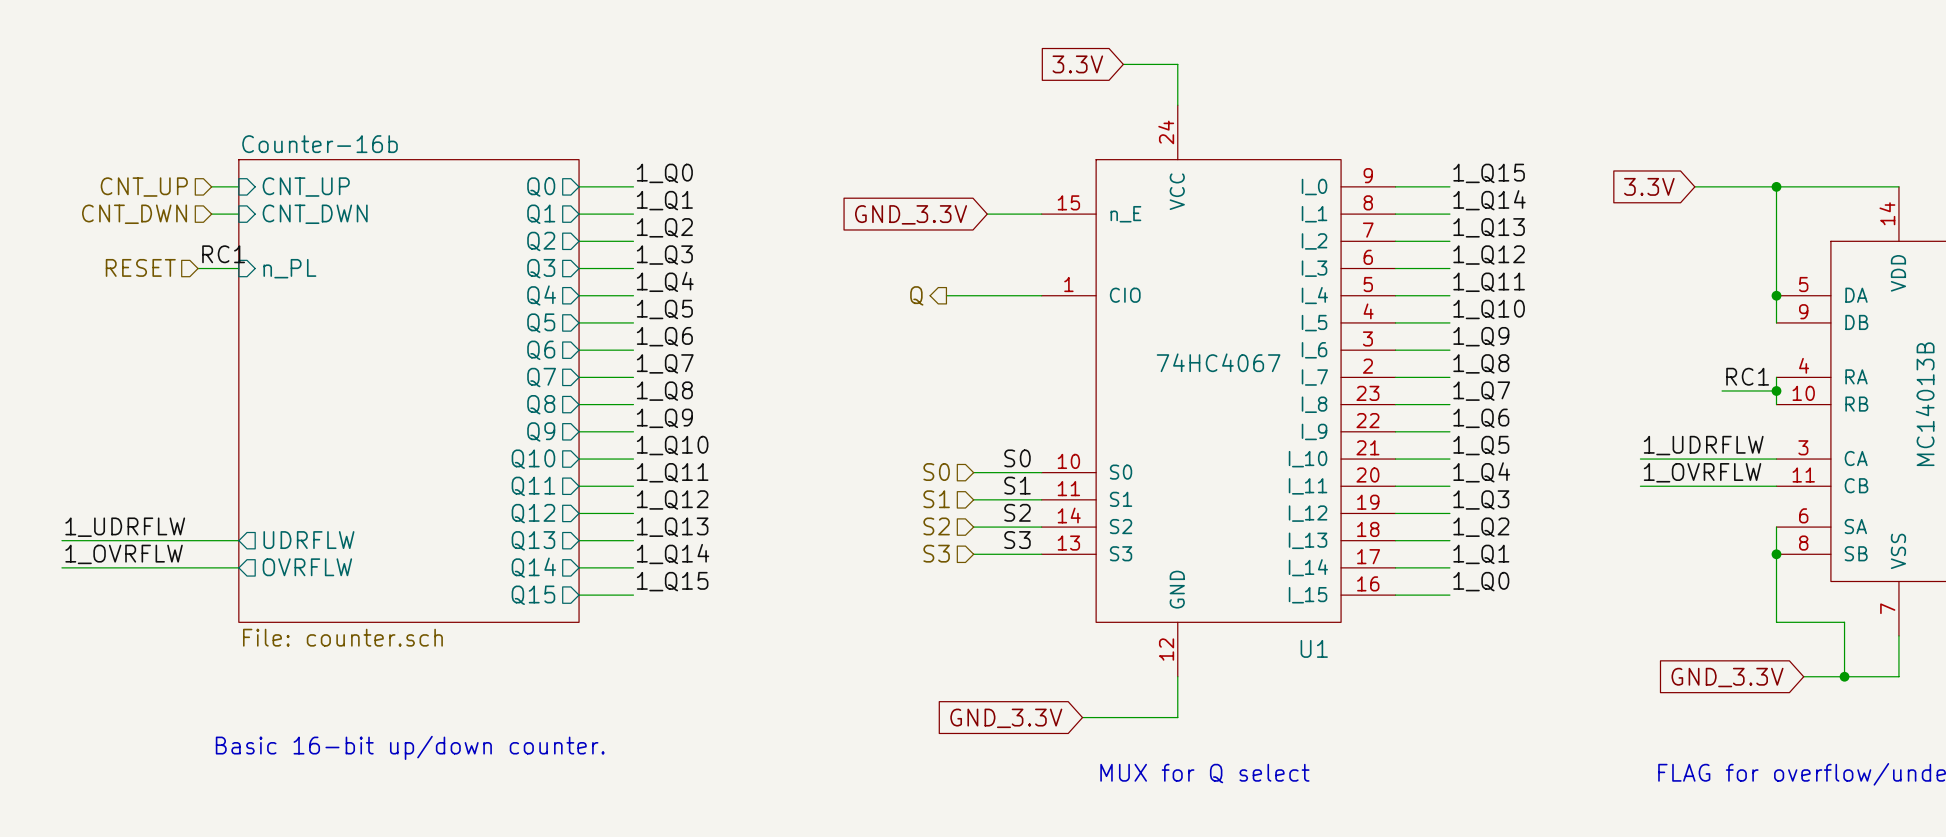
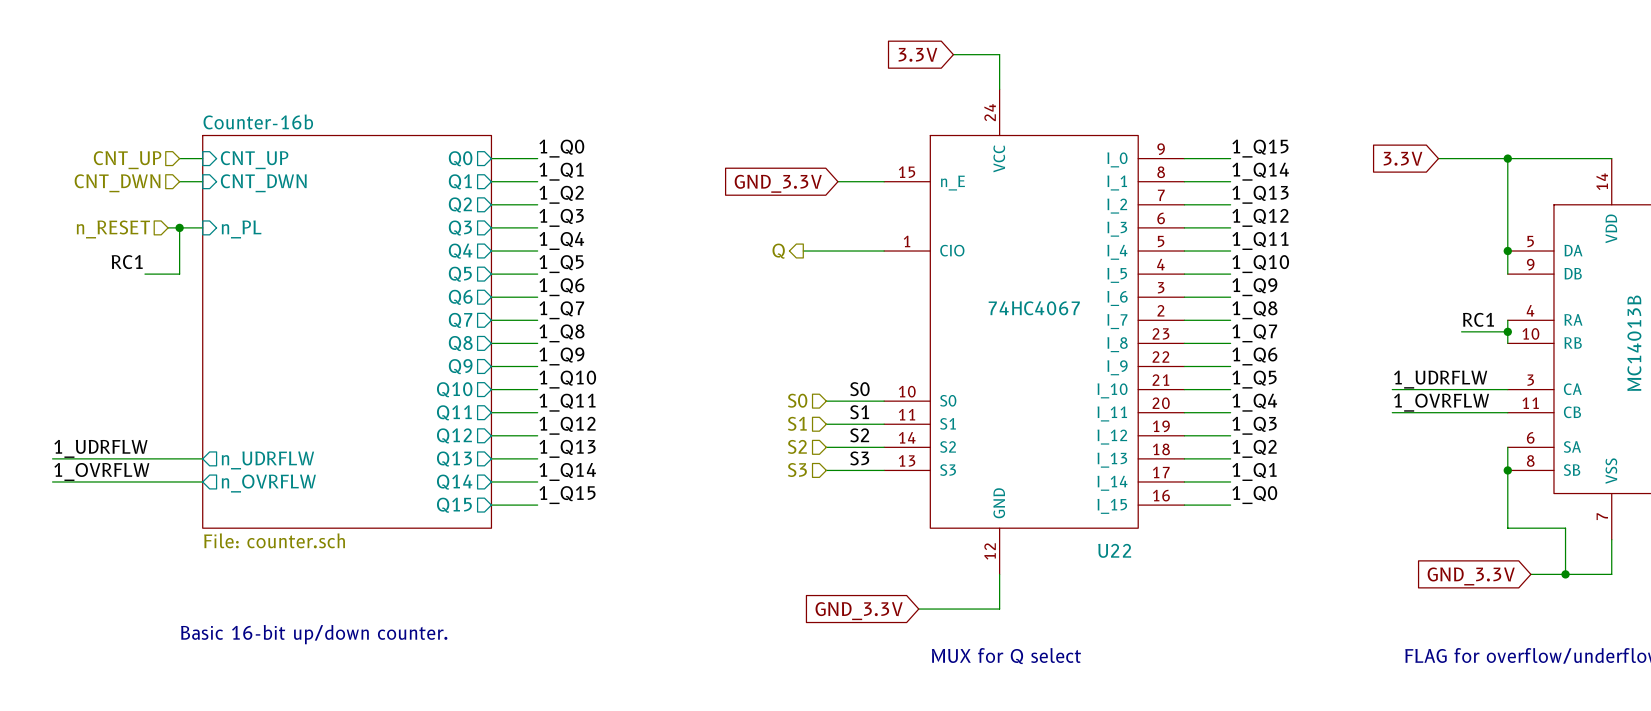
label position: RC1 (223, 254) -> RC1 (127, 262)
hierarchical label: RESET (140, 267) -> n_RESET (113, 229)
wire: none -> (179, 227) (179, 274) (144, 274)
junction: none -> (179, 227)
sheet pin: UDRFLW (308, 540) -> n_UDRFLW (267, 460)
sheet pin: OVRFLW (307, 567) -> n_OVRFLW (268, 483)
U1 name: U1 (1314, 648) -> U22 (1114, 550)

